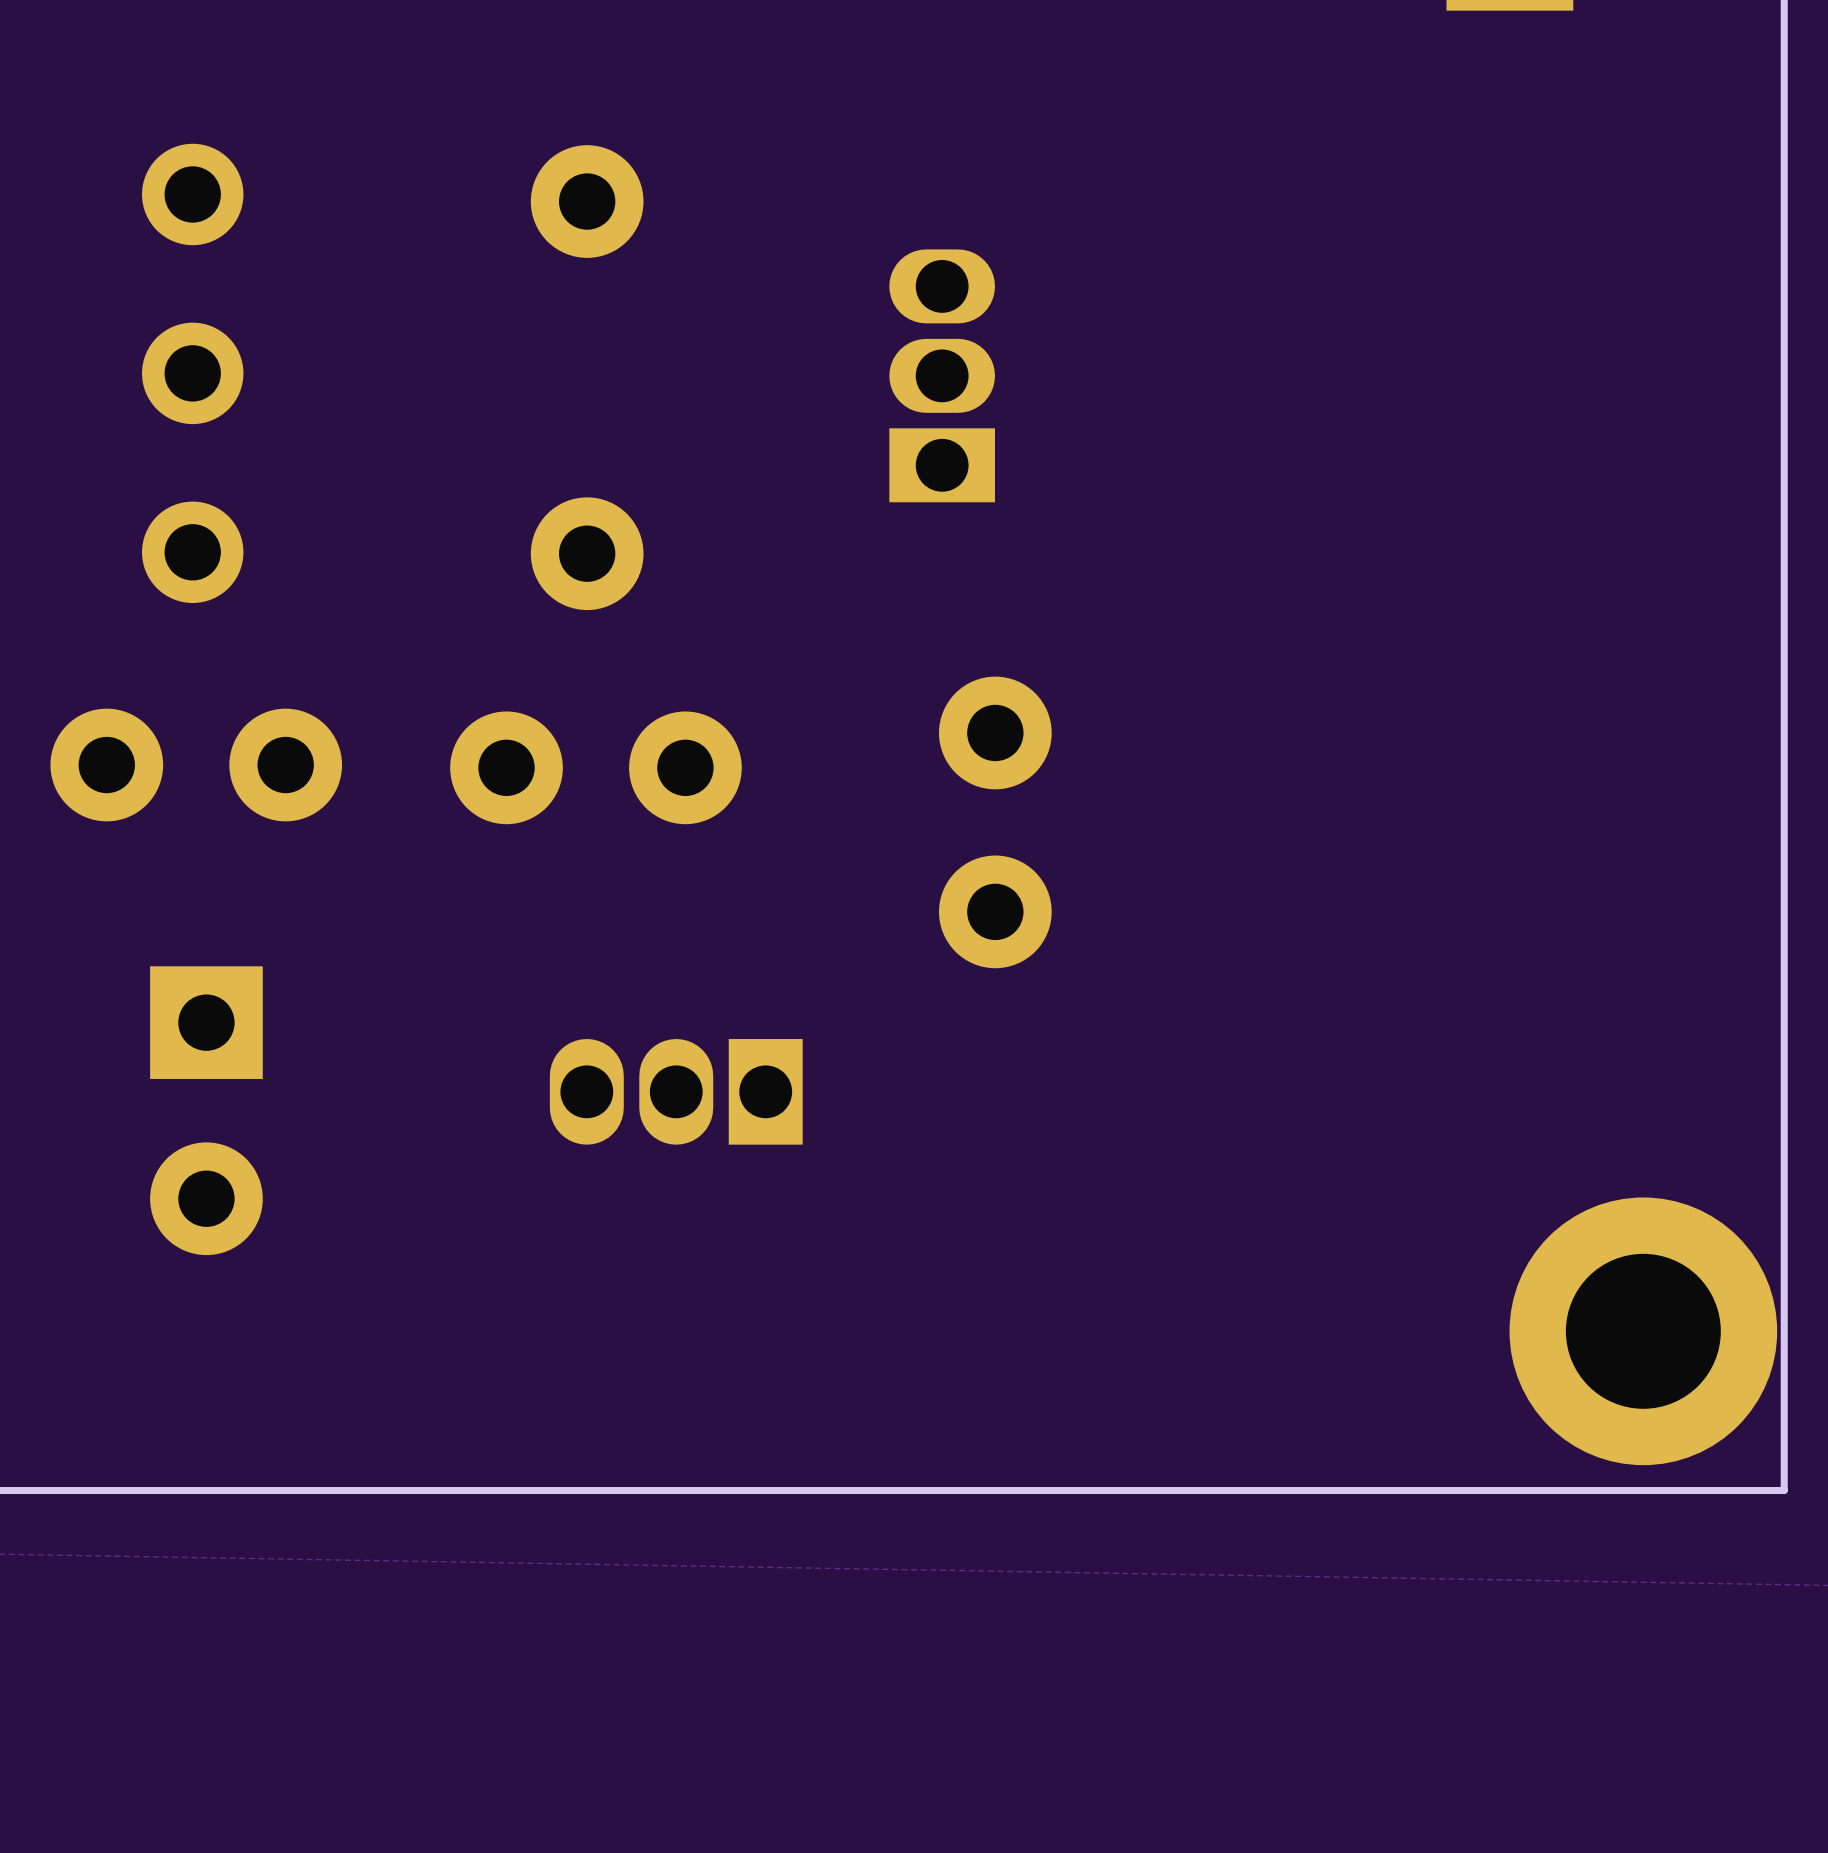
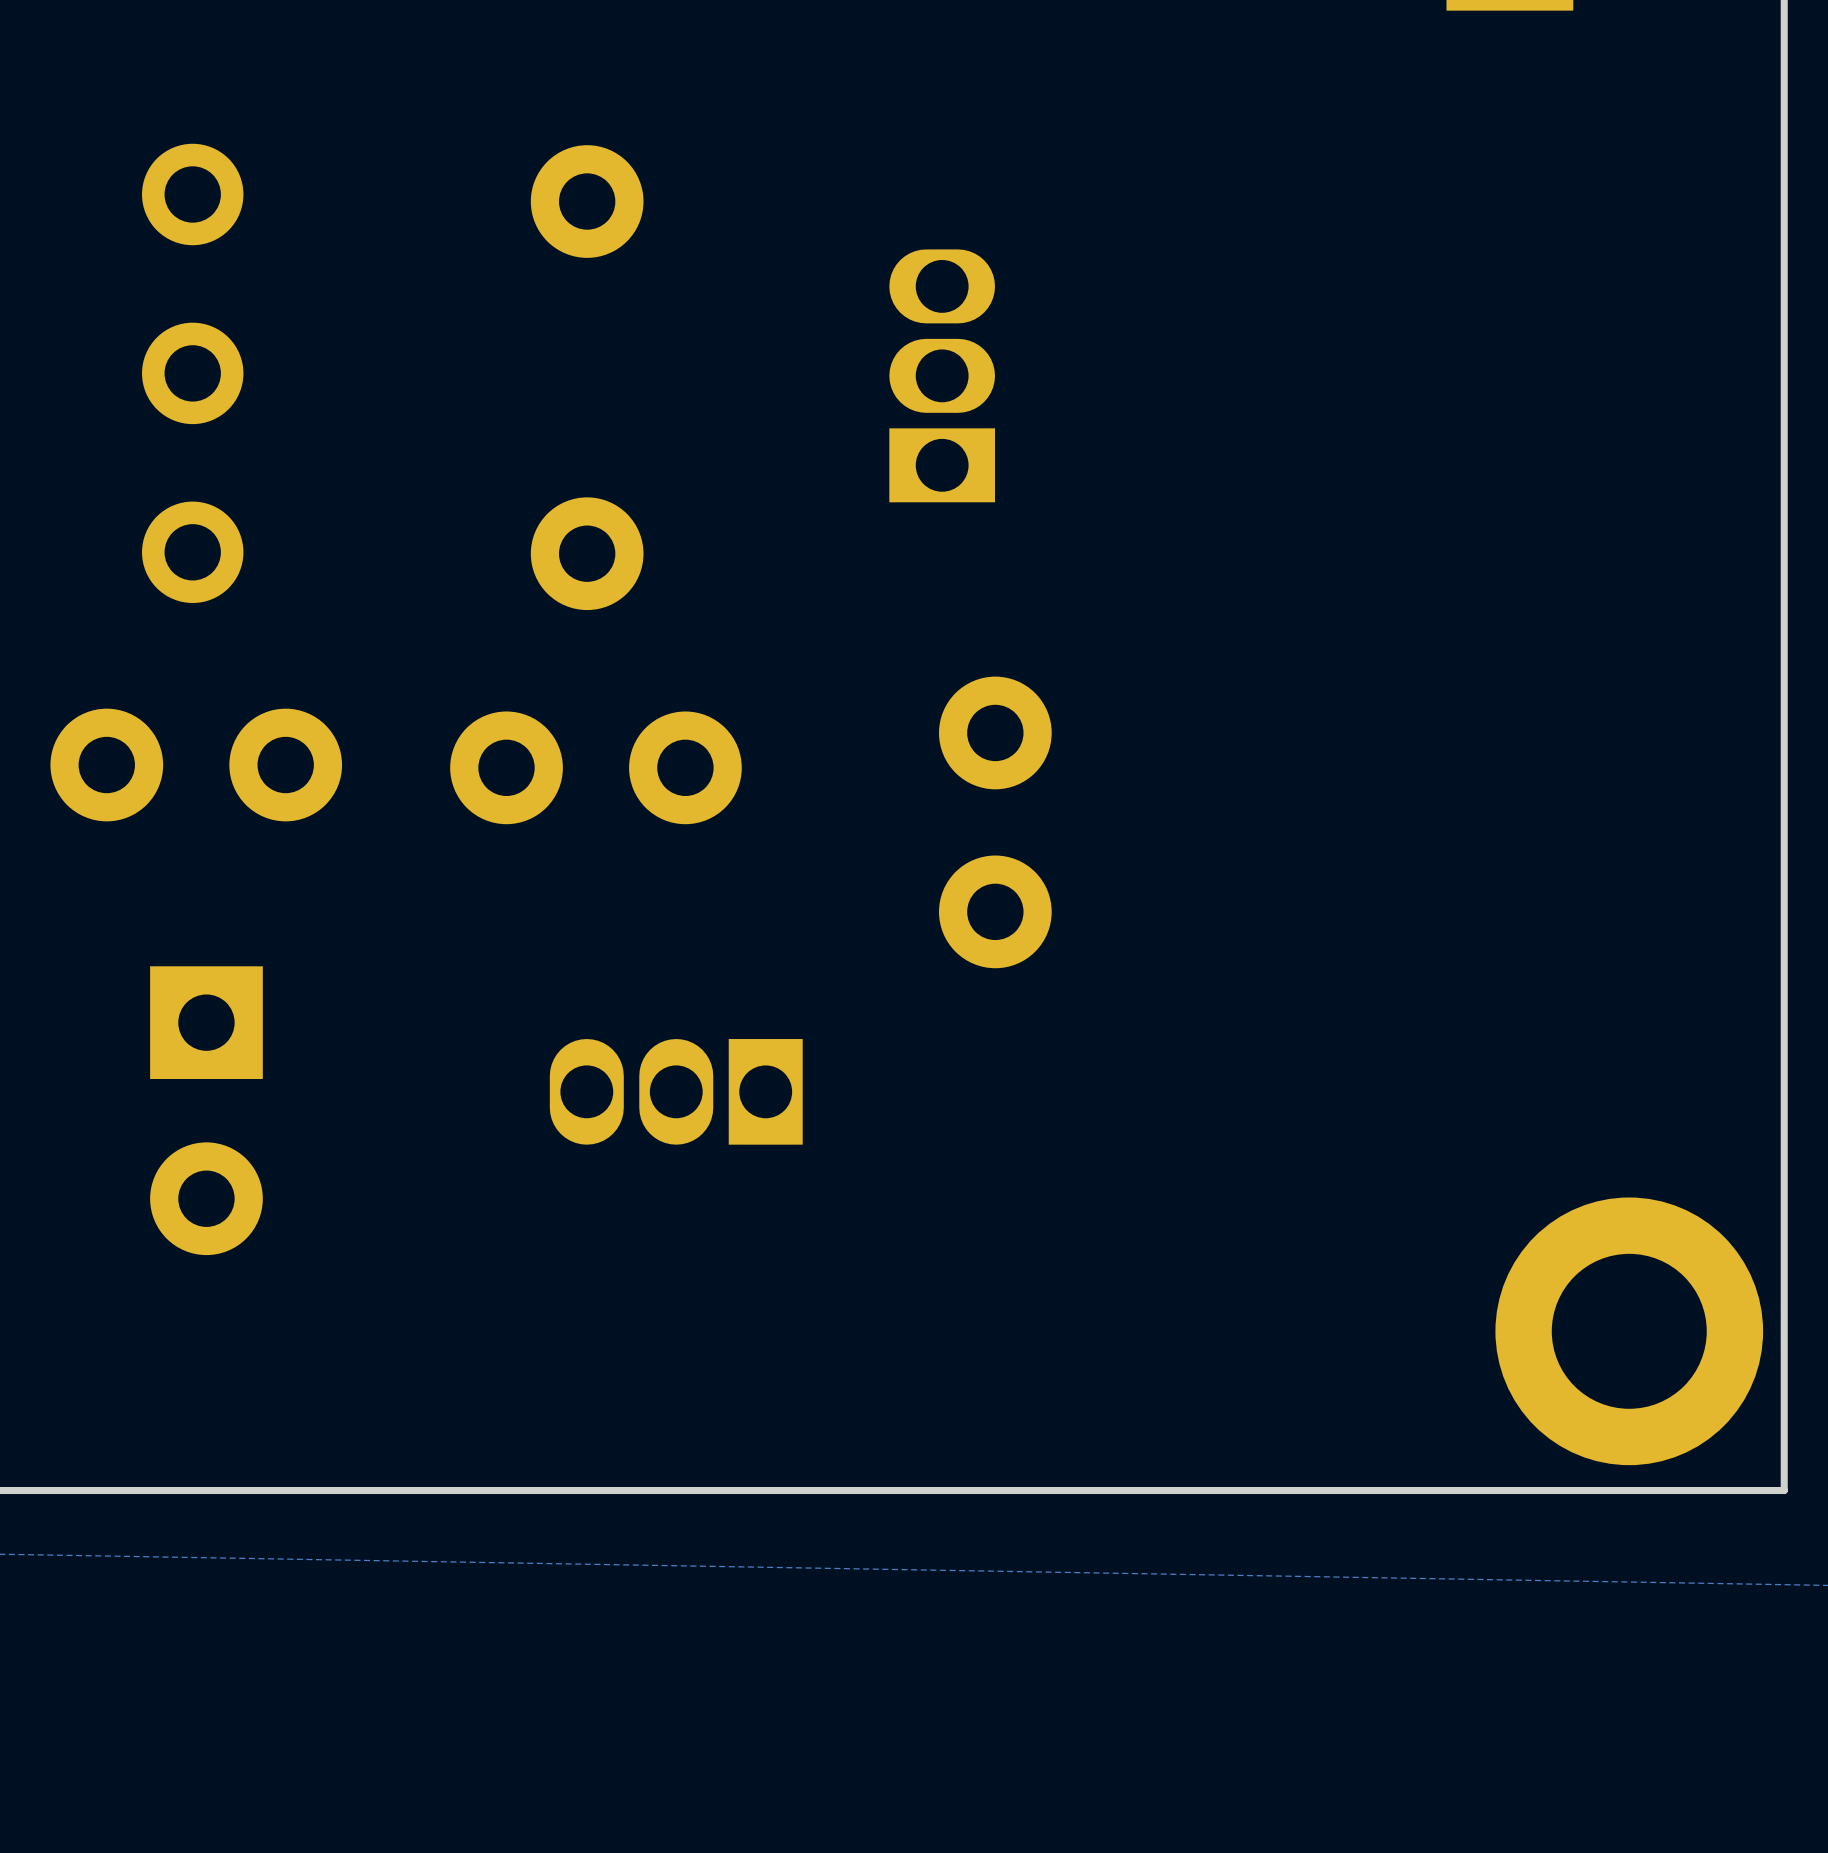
part position: (1643, 1331) -> (1629, 1331)

